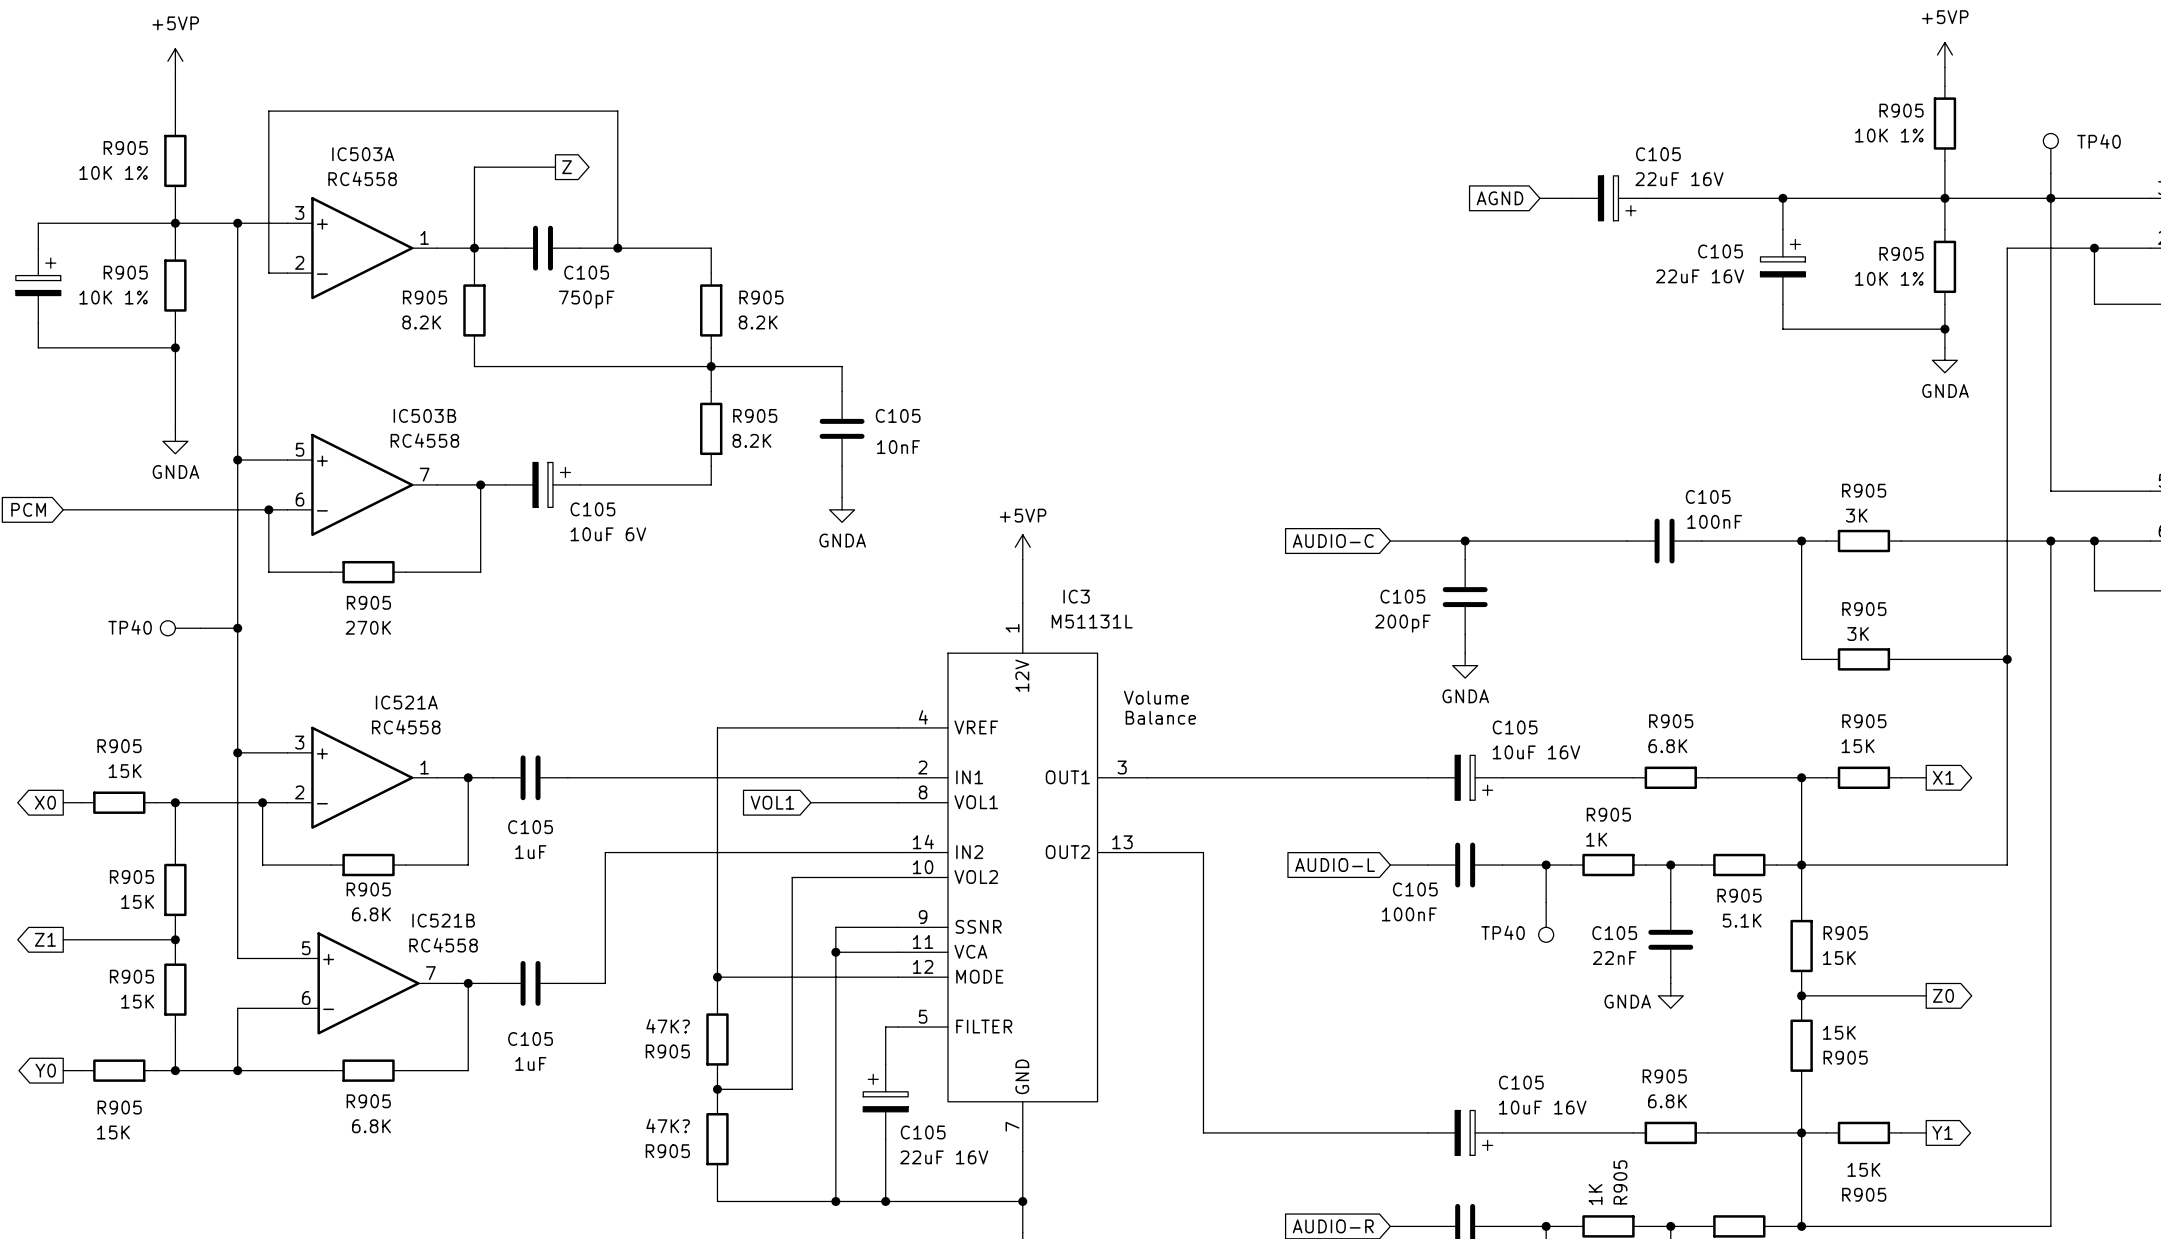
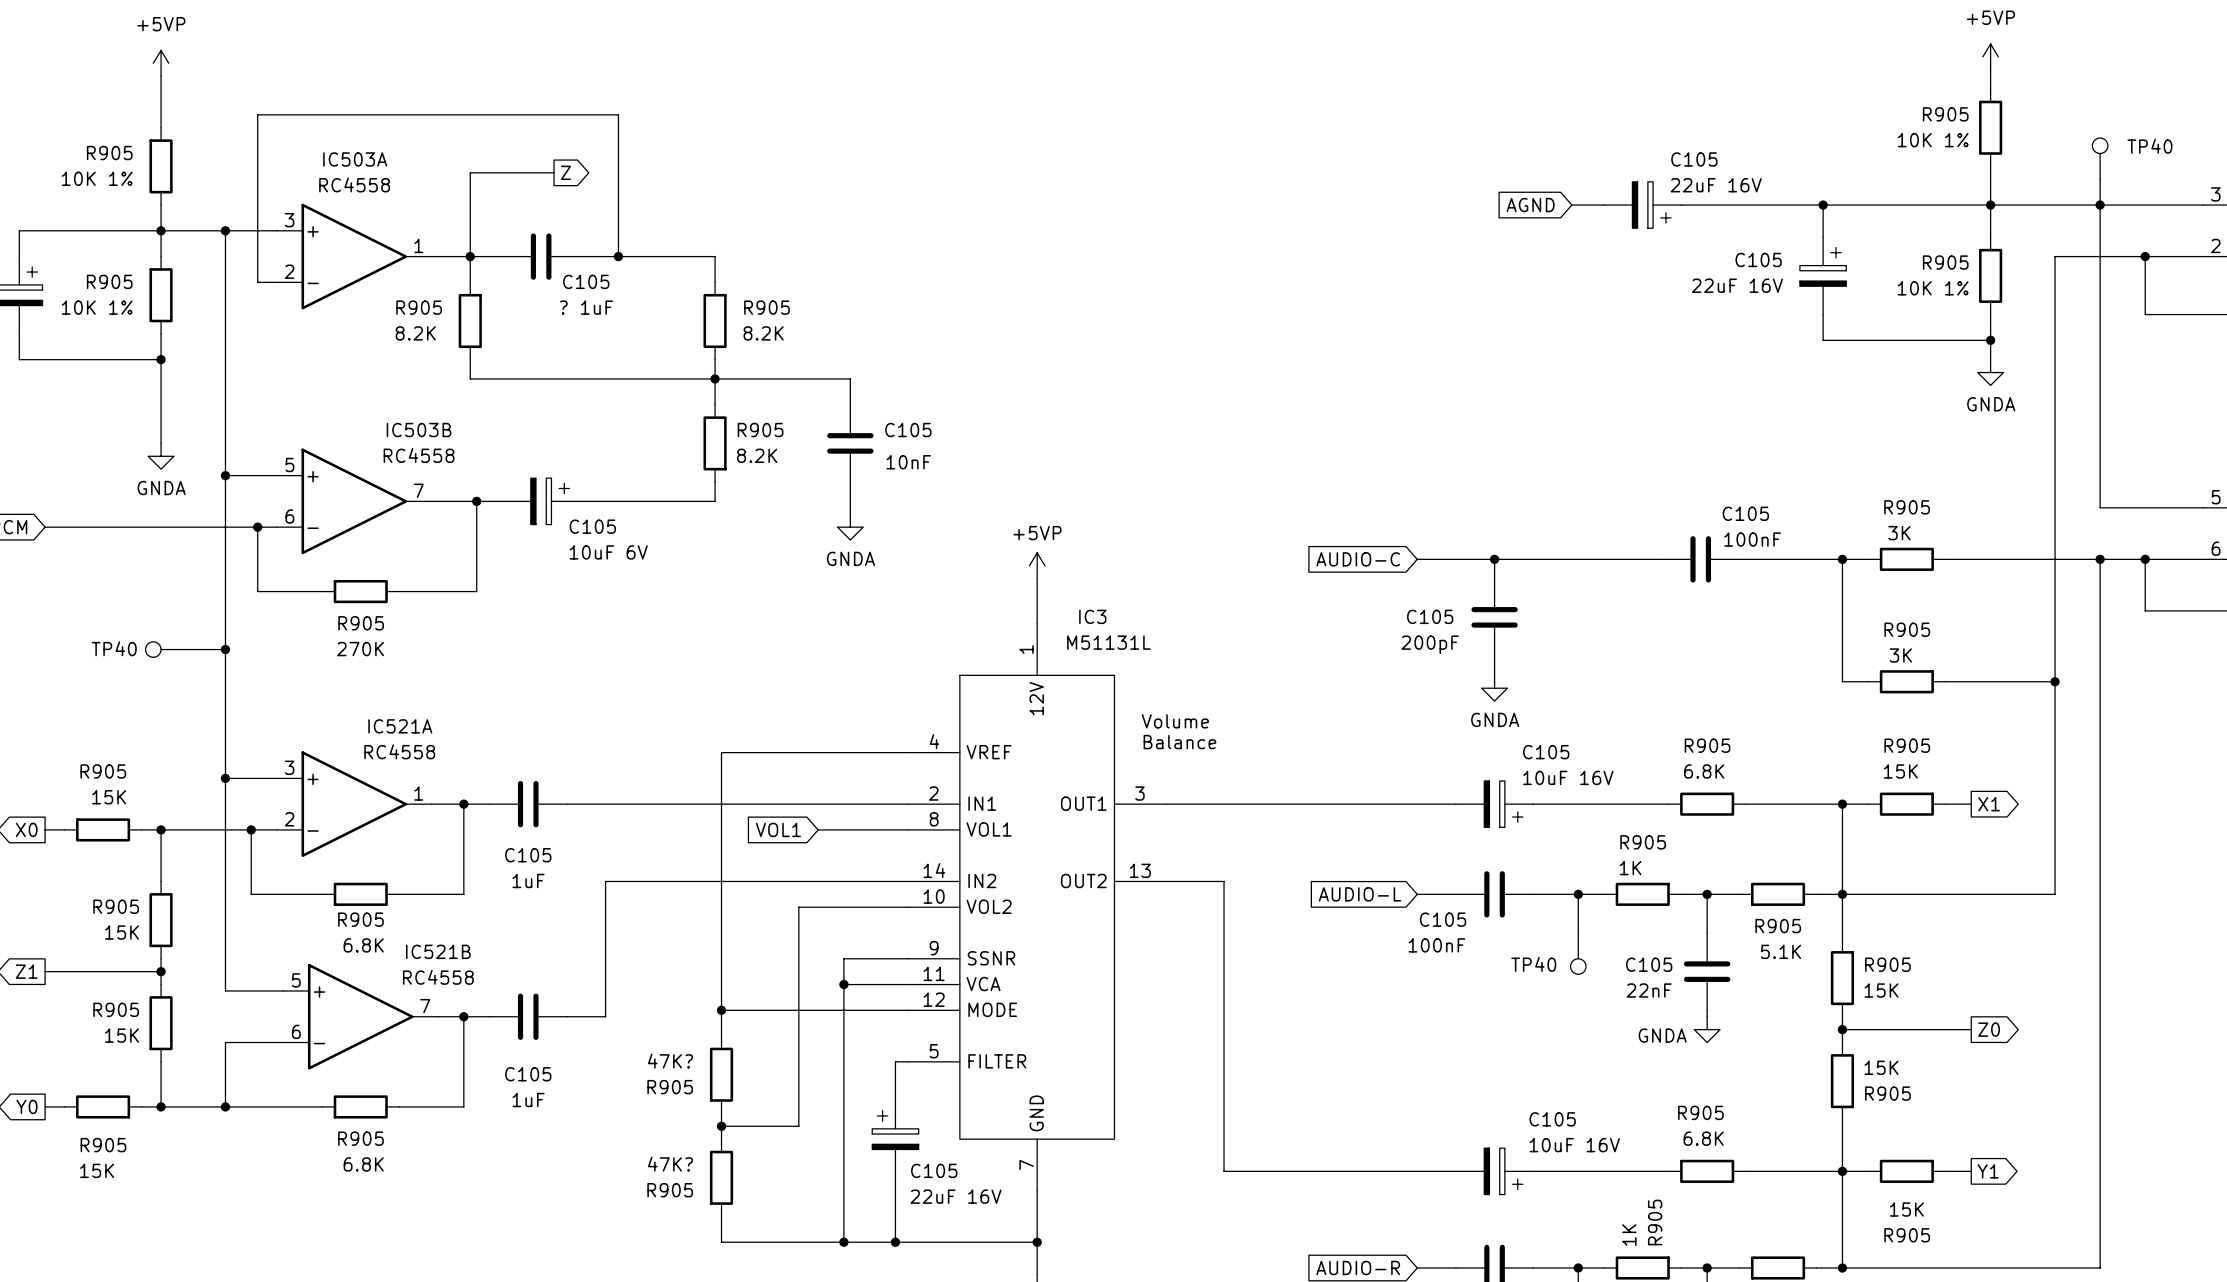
C105 value: 750pF (586, 299) -> ? 1uF (586, 307)

